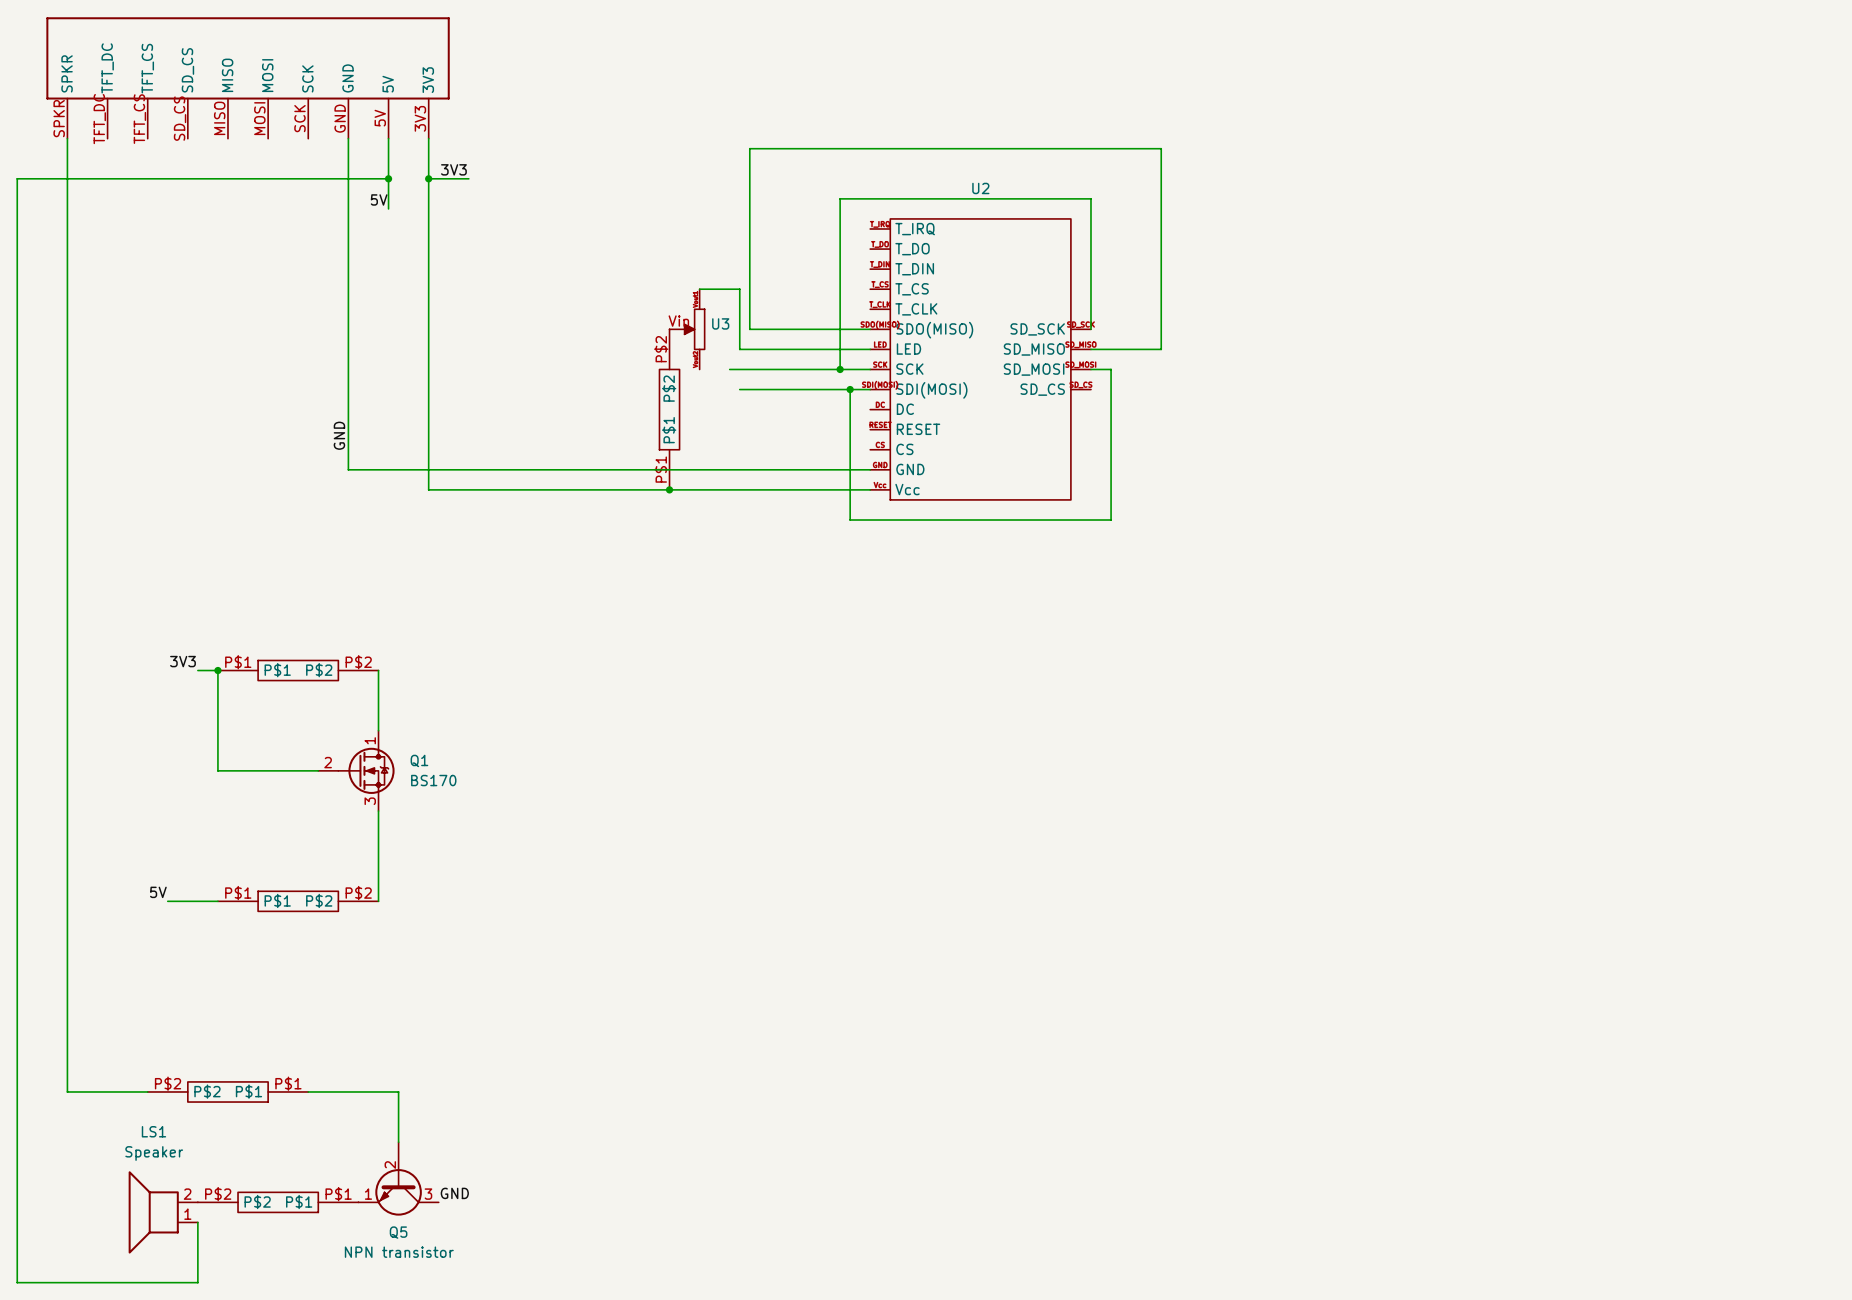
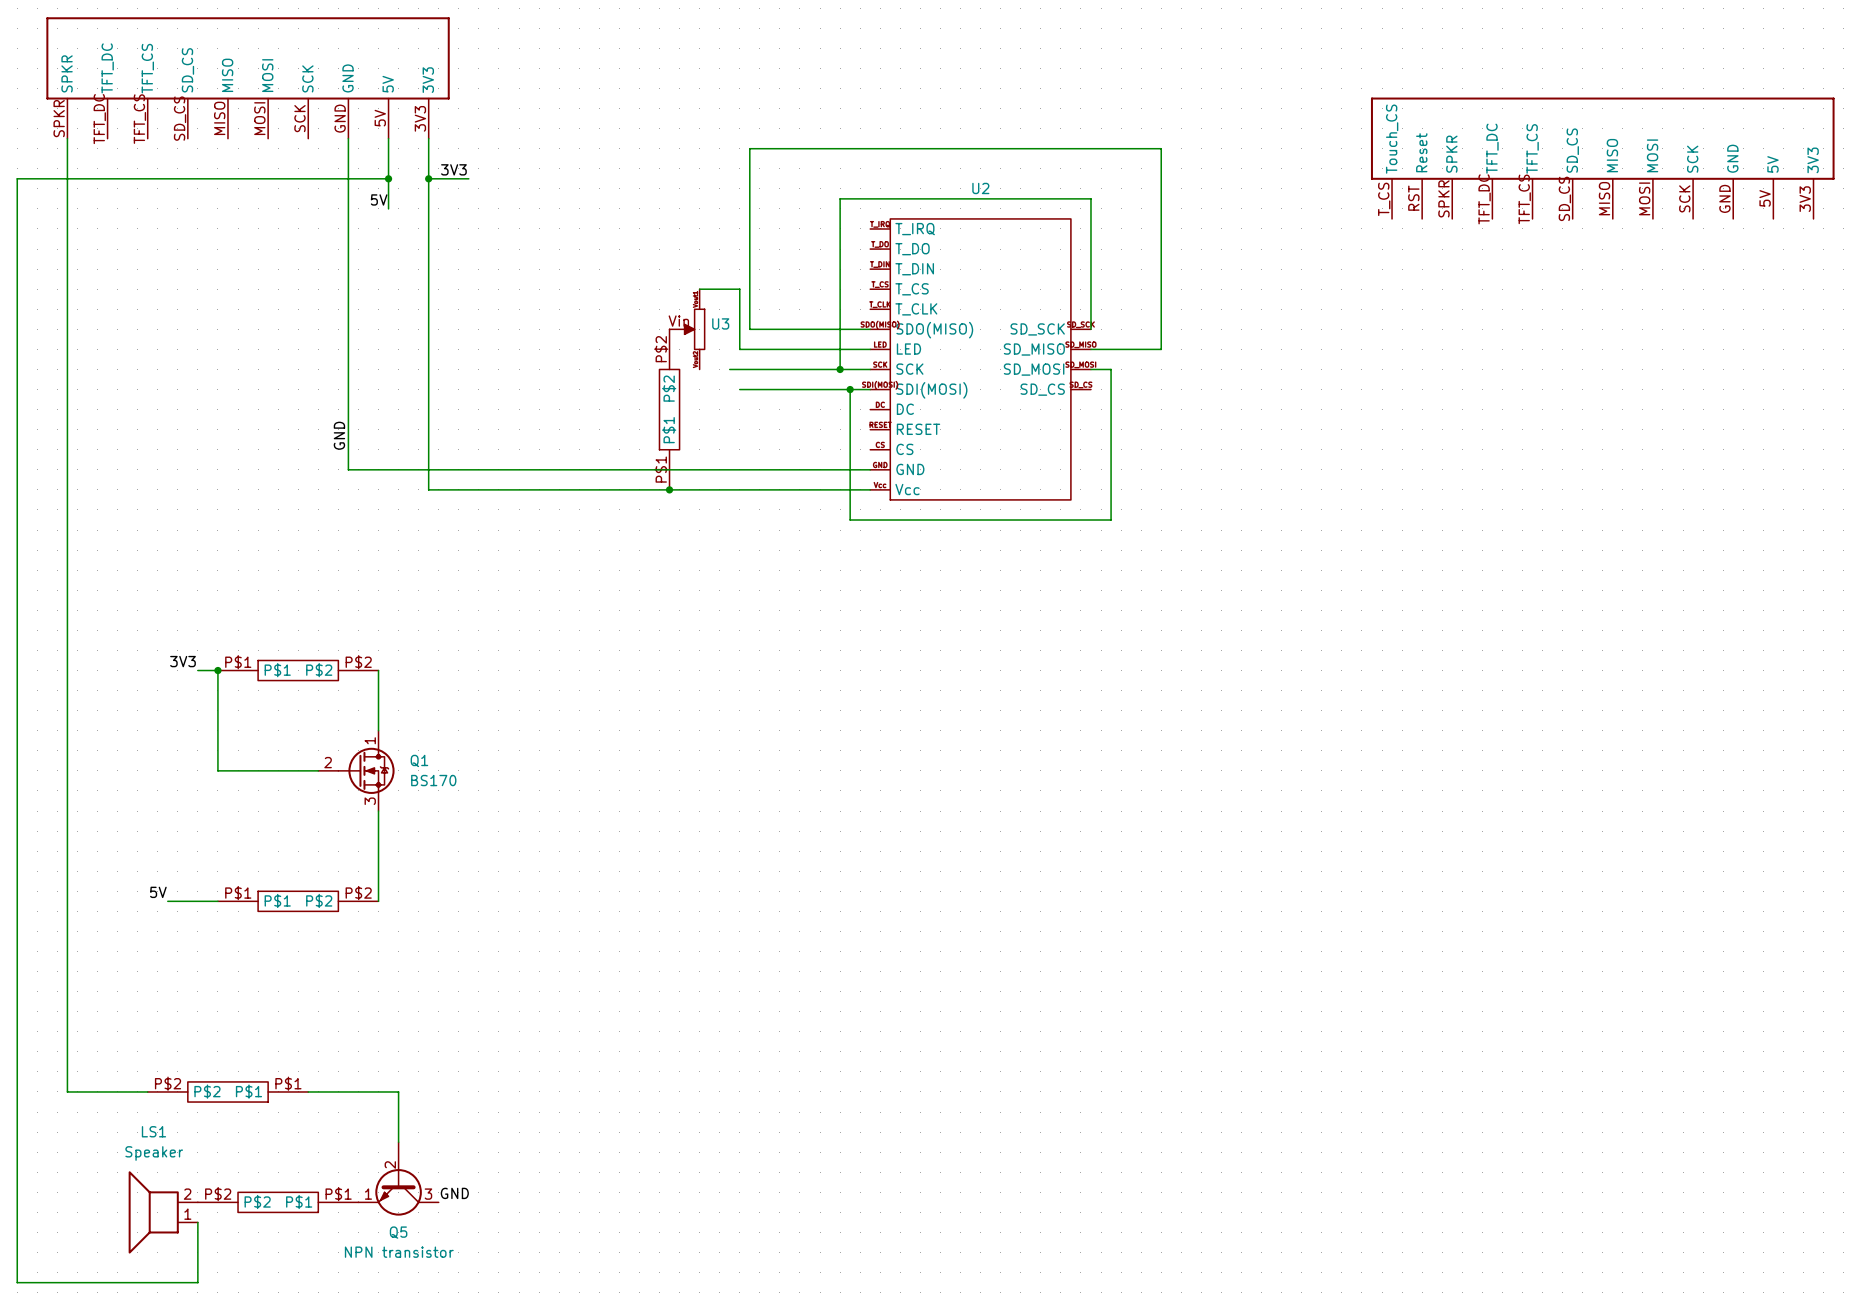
part: none -> (1602, 158)

